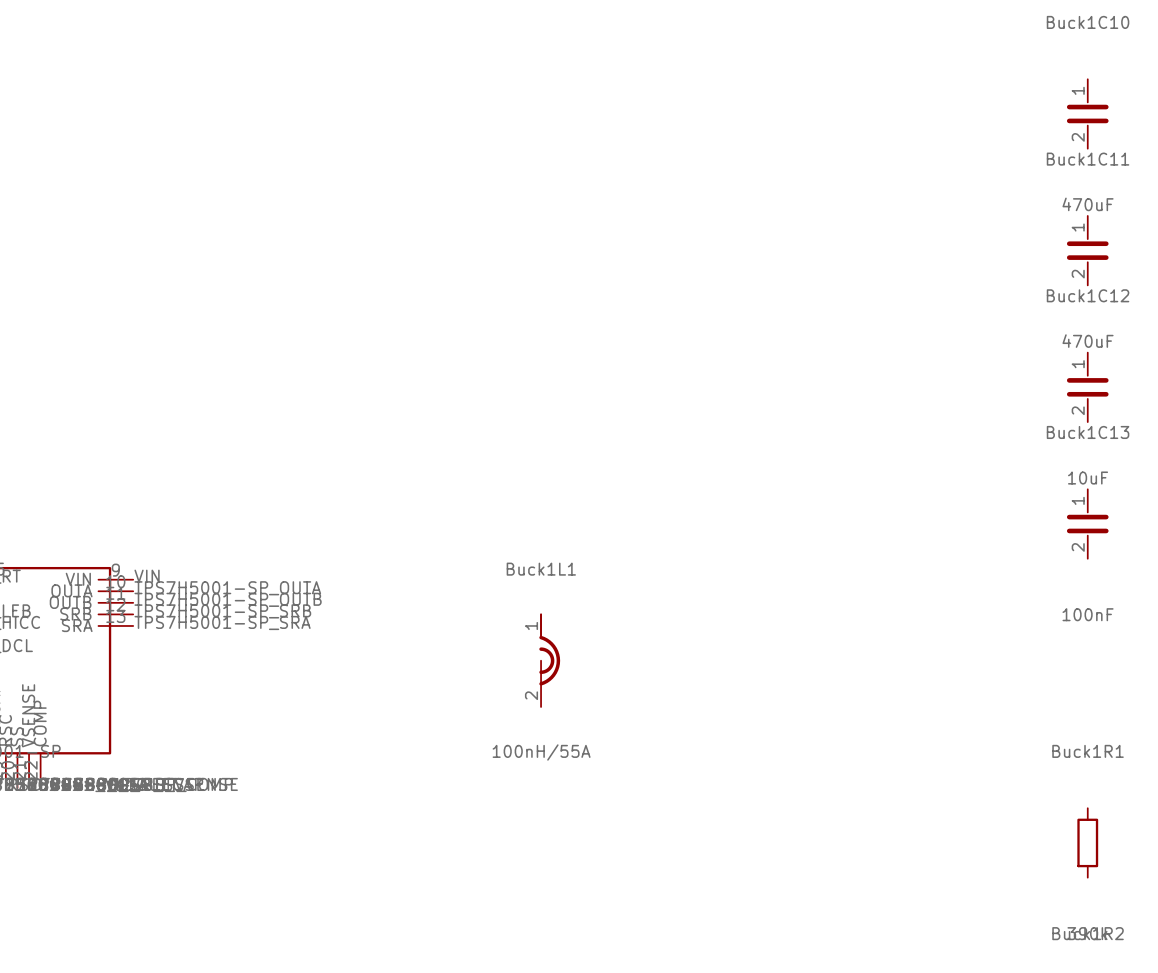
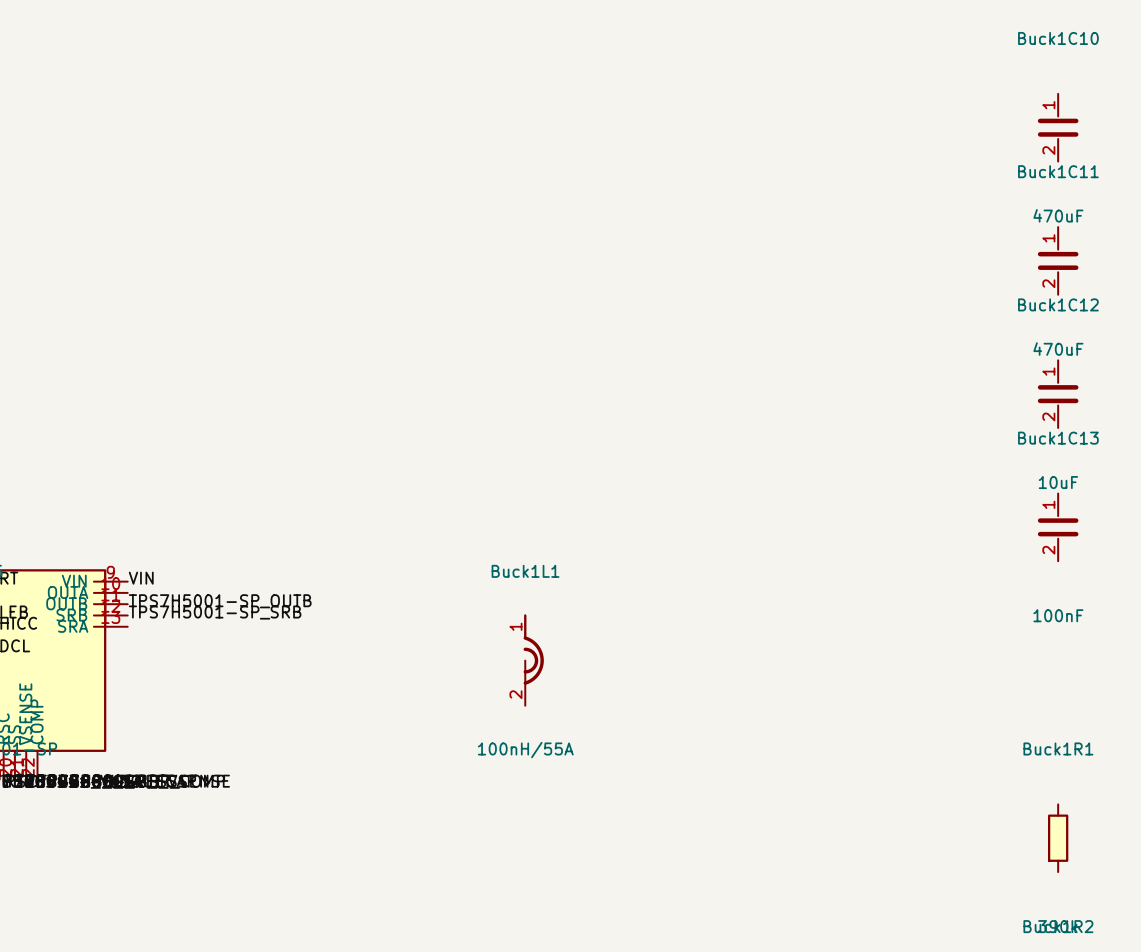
label: TPS7H5001-SP_OUTA (227, 588) -> none
label: TPS7H5001-SP_SRA (222, 622) -> none

